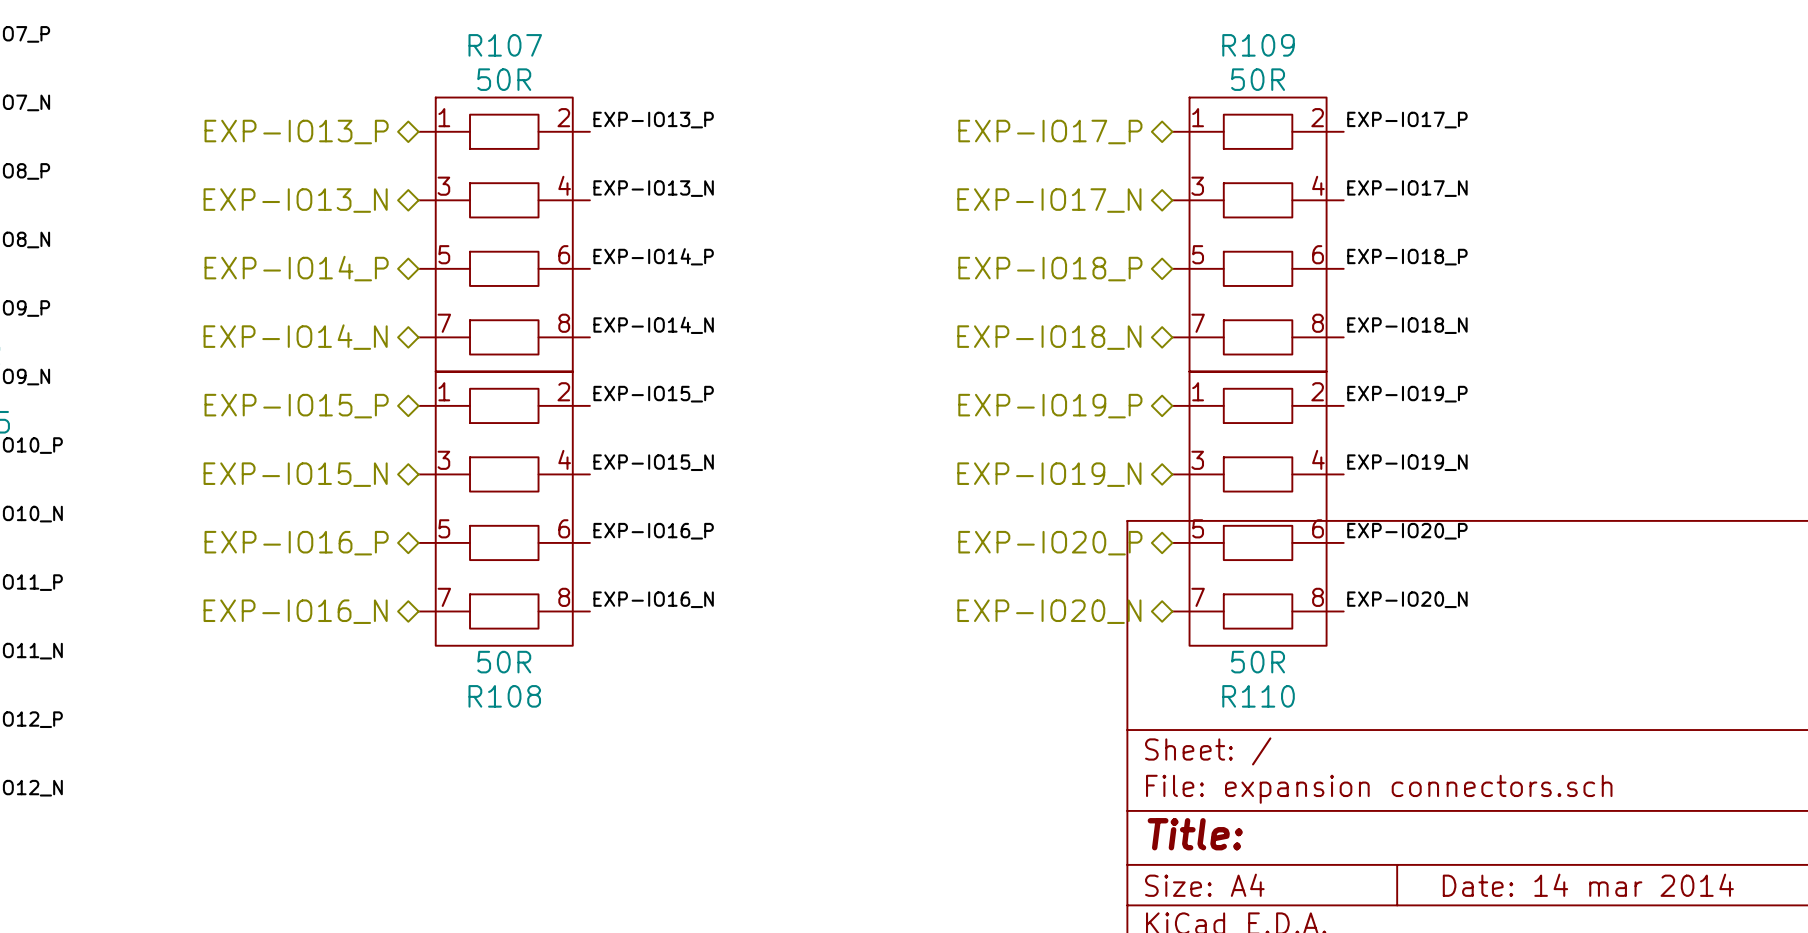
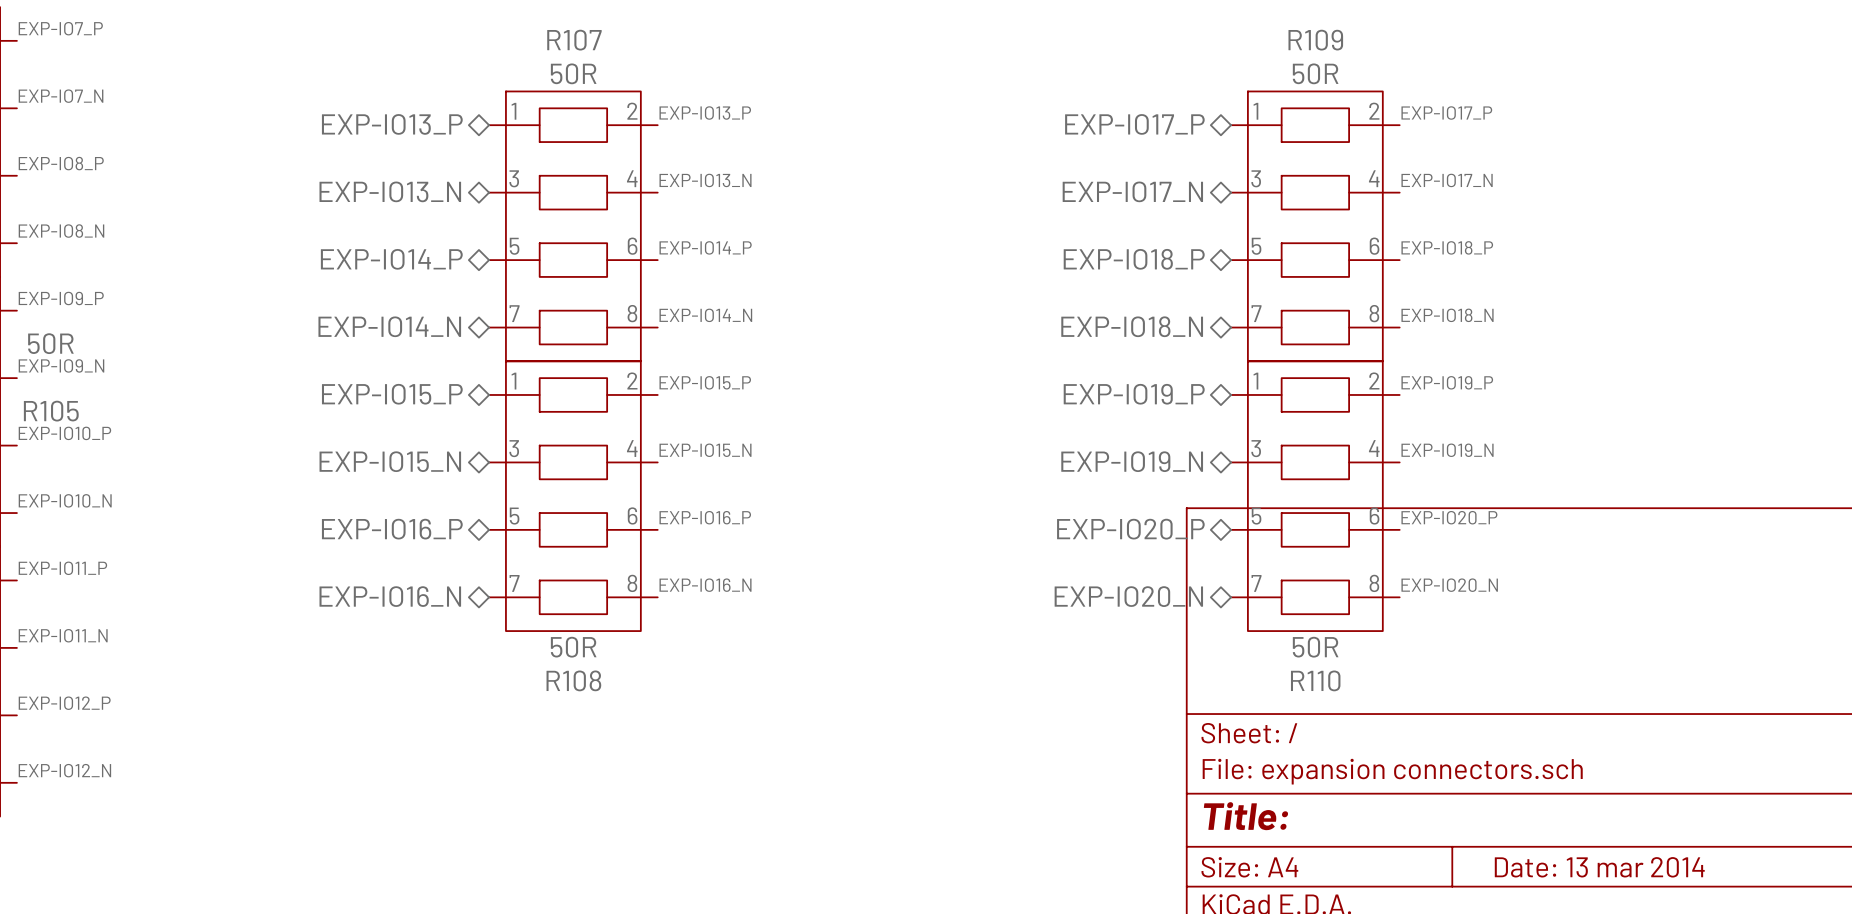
title block: Date: 14 mar 2014 (1588, 885) -> Date: 13 mar 2014 (1599, 867)

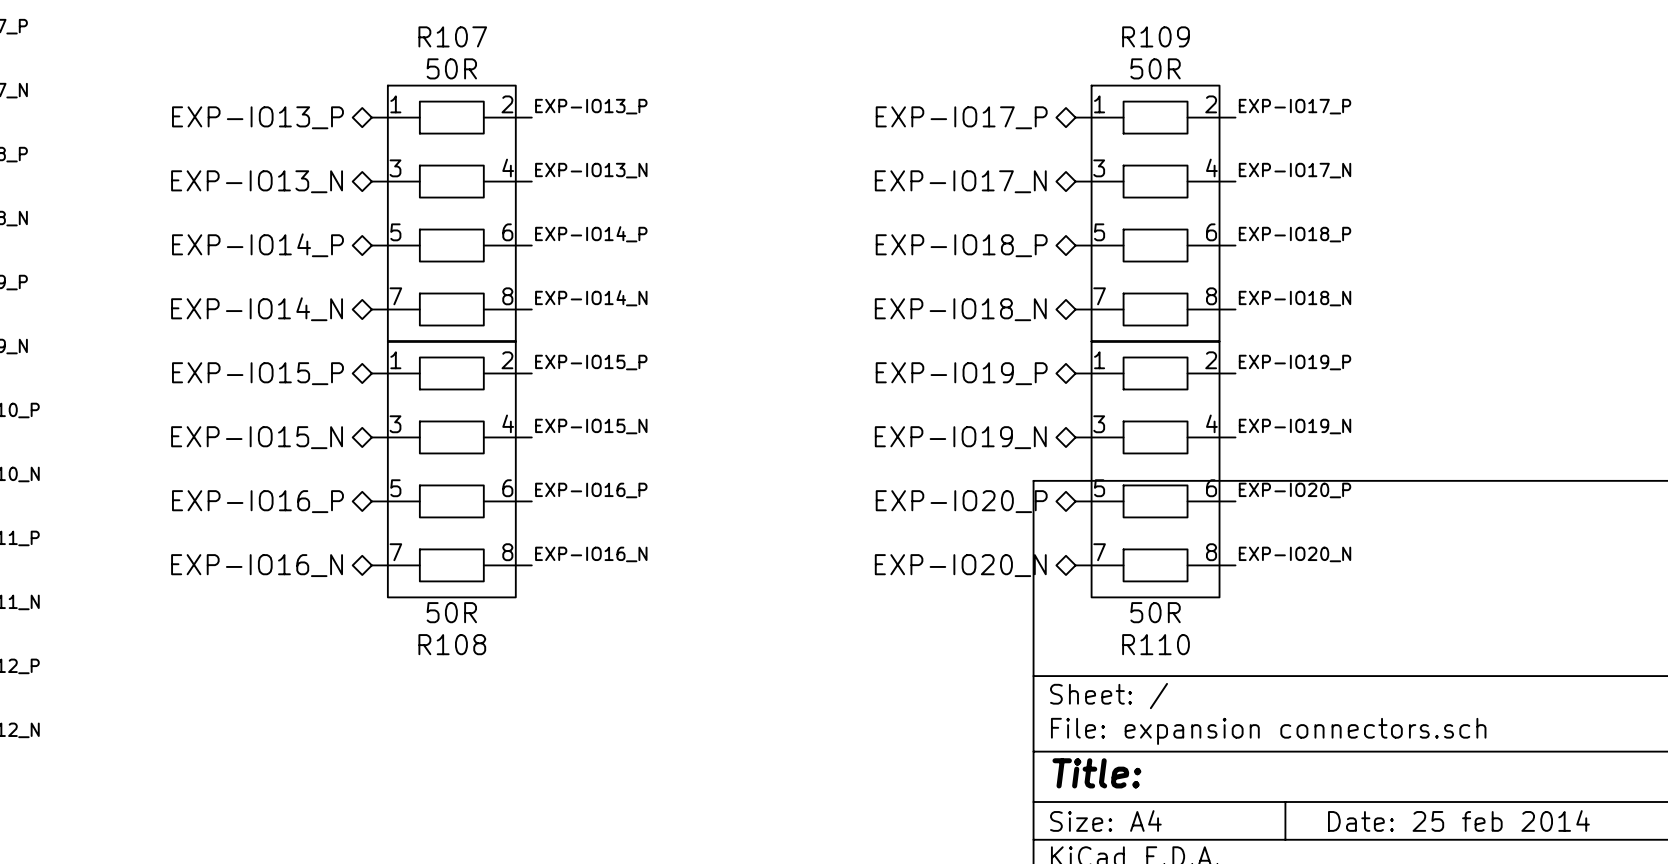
title block: Date: 13 mar 2014 (1599, 867) -> Date: 25 feb 2014 (1458, 820)

